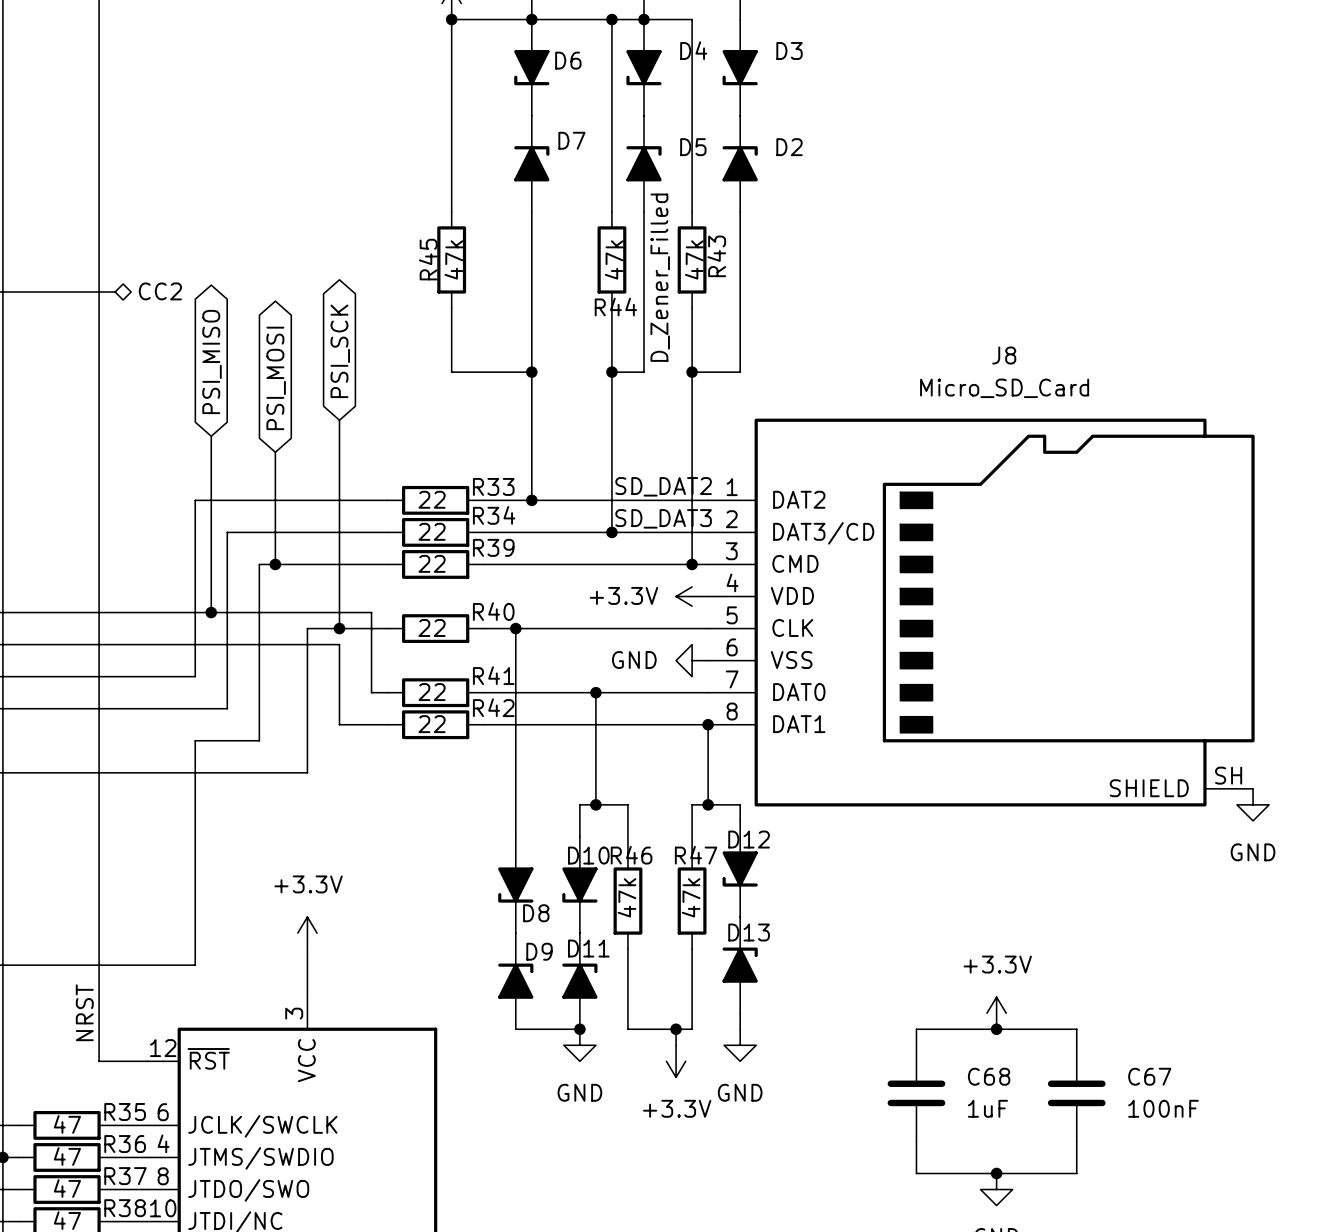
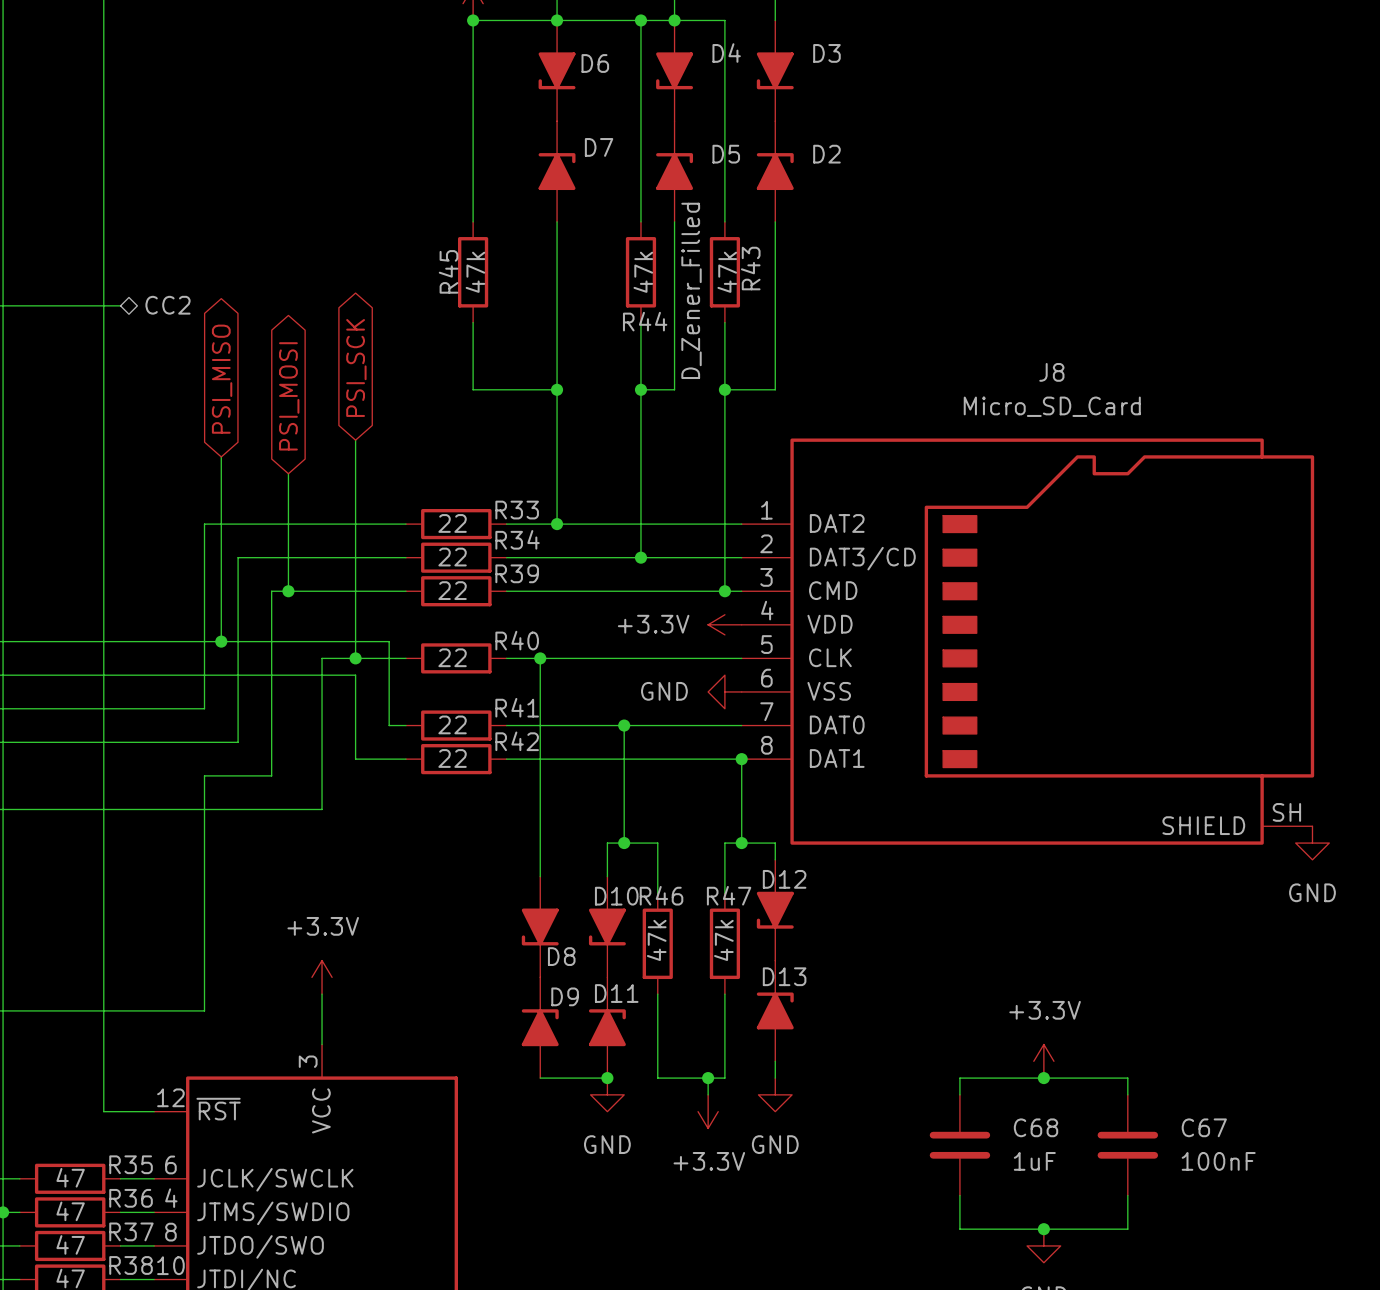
label: SD_DAT2 (663, 486) -> none
label: SD_DAT3 (663, 518) -> none
label: NRST (84, 1012) -> none

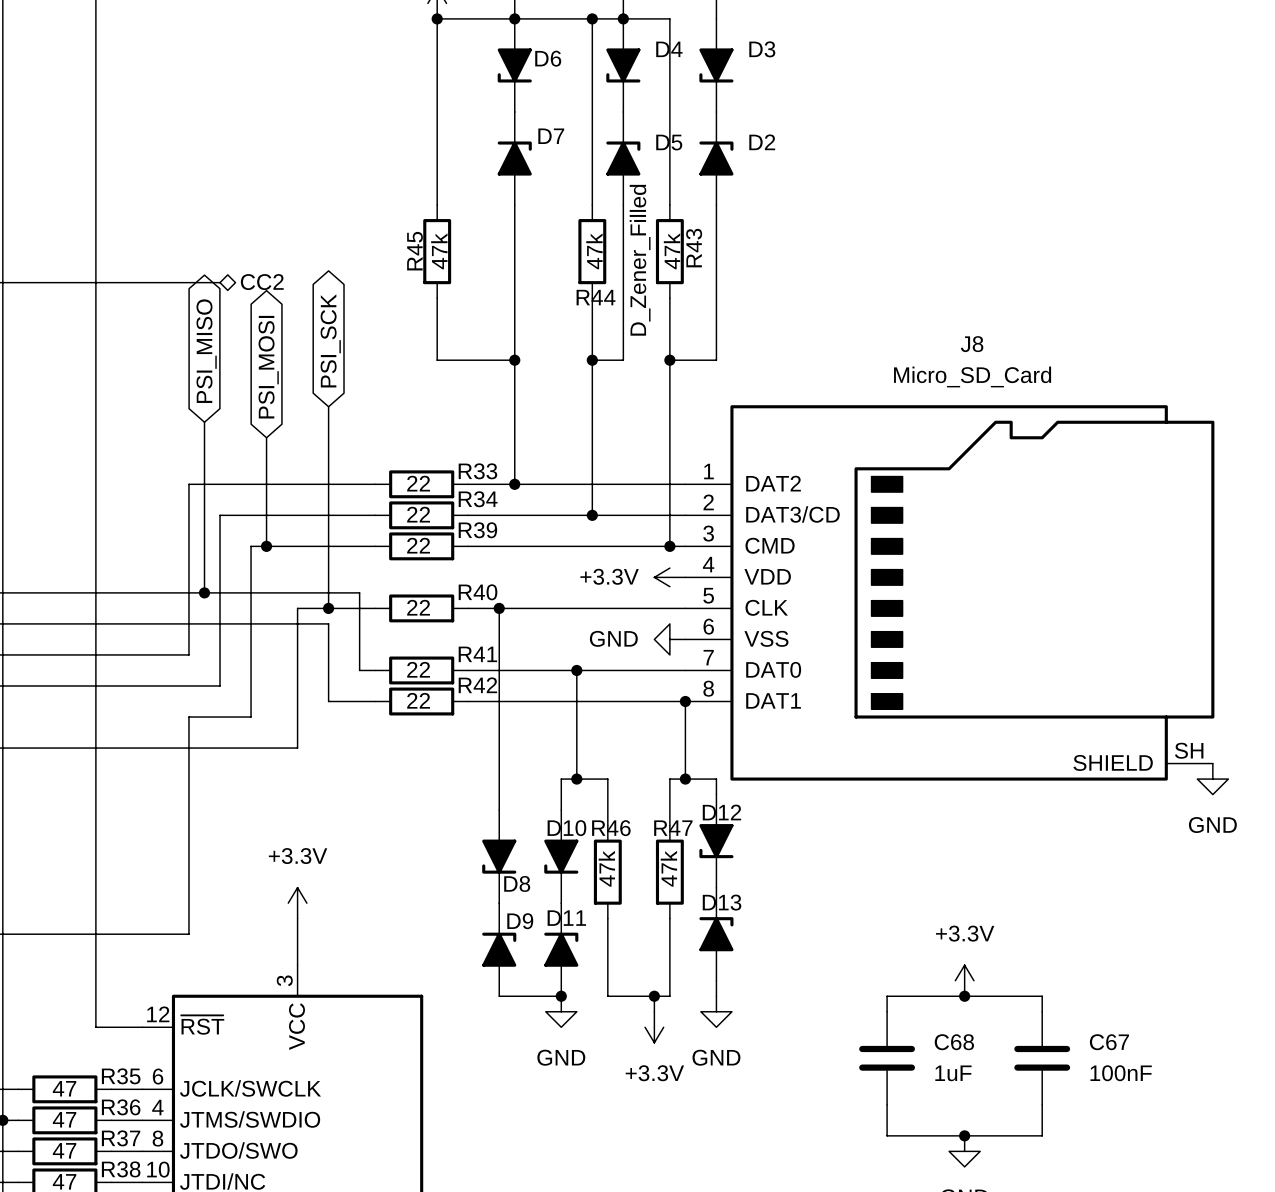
wire: none -> (111, 282) (220, 282)
hierarchical label position: CC2 (167, 305) -> CC2 (262, 282)

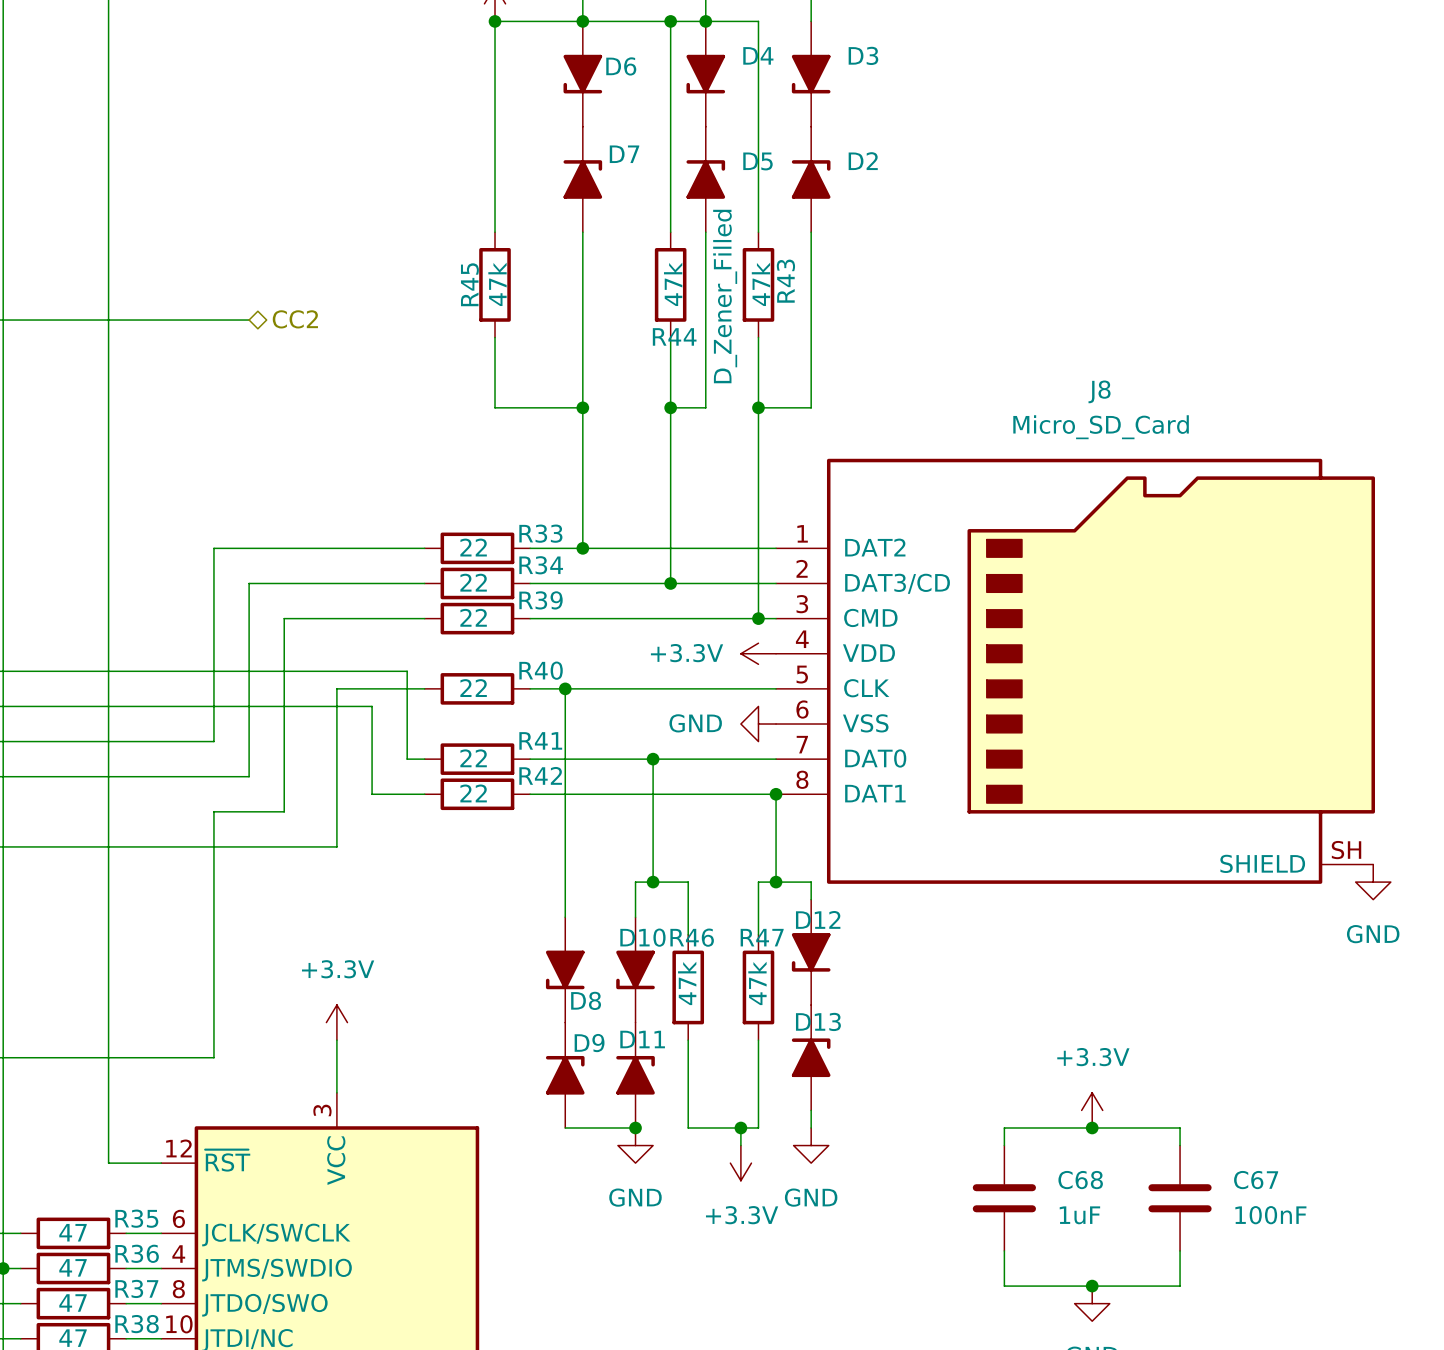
global label: PSI_SCK (330, 340) -> none
global label: PSI_MISO (206, 351) -> none
global label: PSI_MOSI (268, 367) -> none
wire: (328, 406) (328, 608) -> none
wire: (204, 422) (204, 592) -> none
wire: (266, 437) (266, 546) -> none
junction: (266, 546) -> none
junction: (204, 592) -> none
junction: (328, 608) -> none

